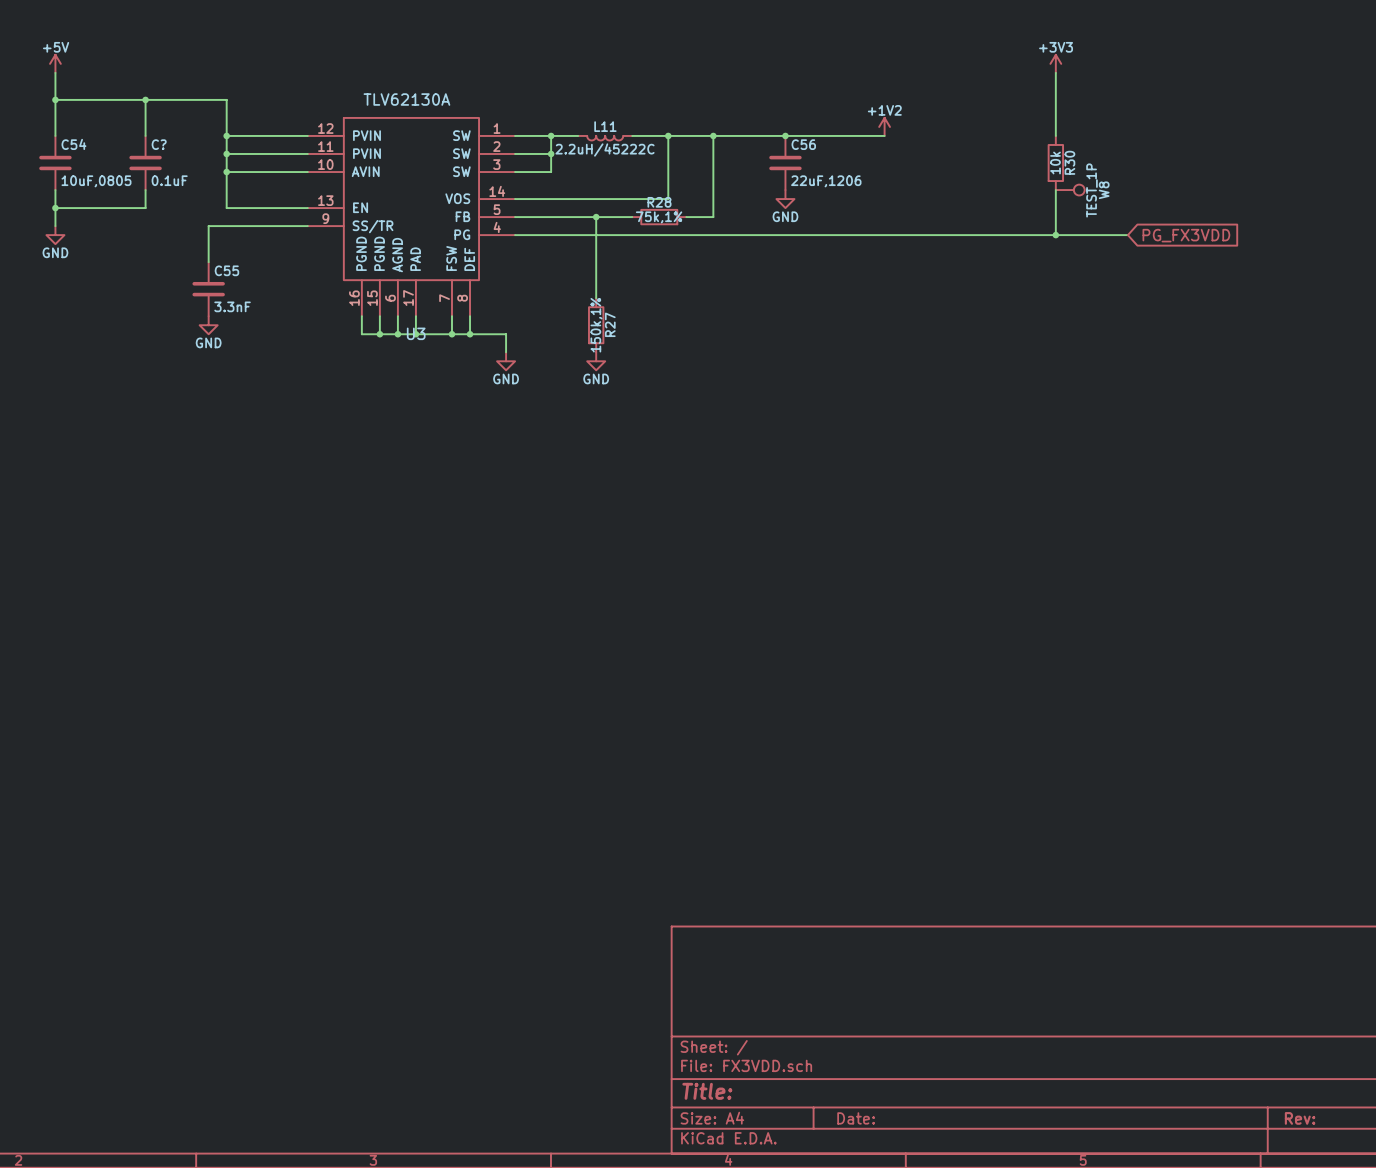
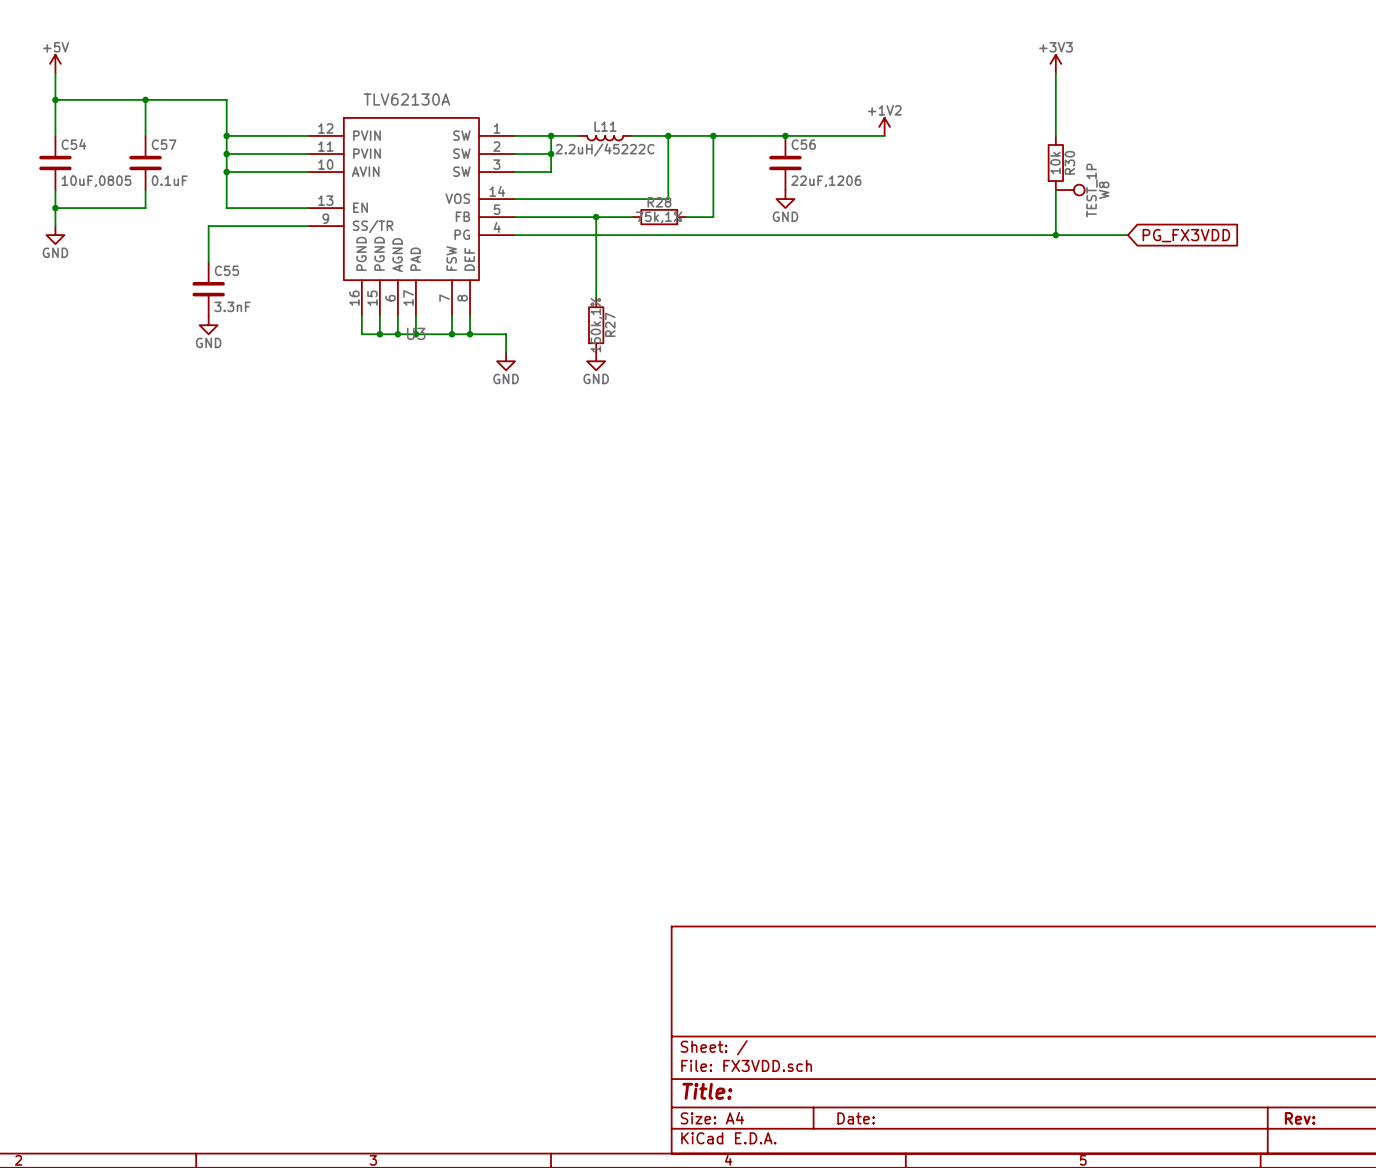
C? name: C? (159, 144) -> C57 (164, 144)

